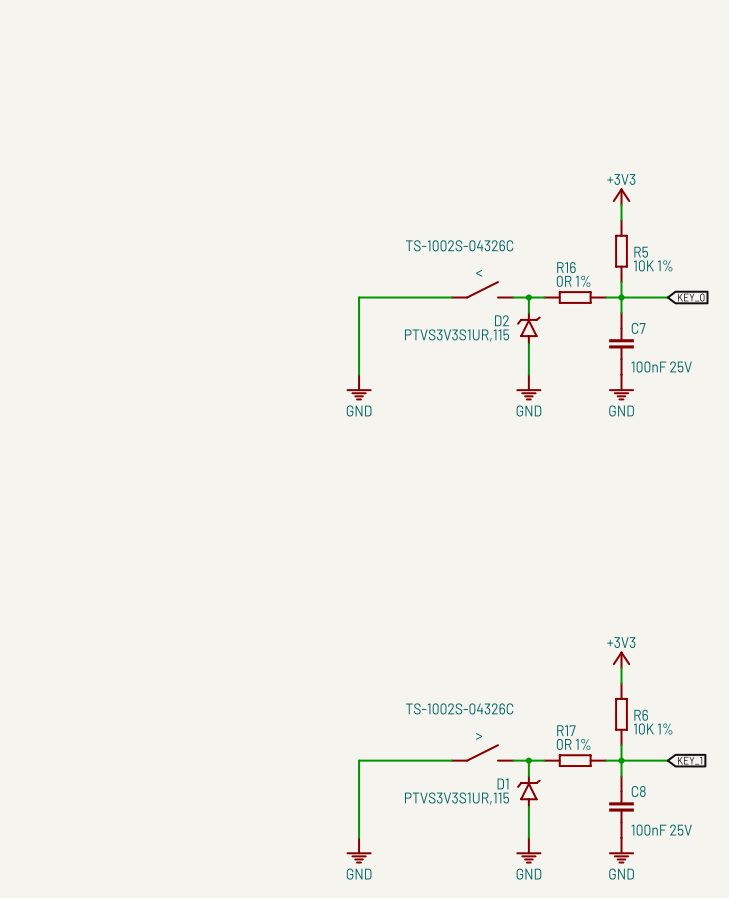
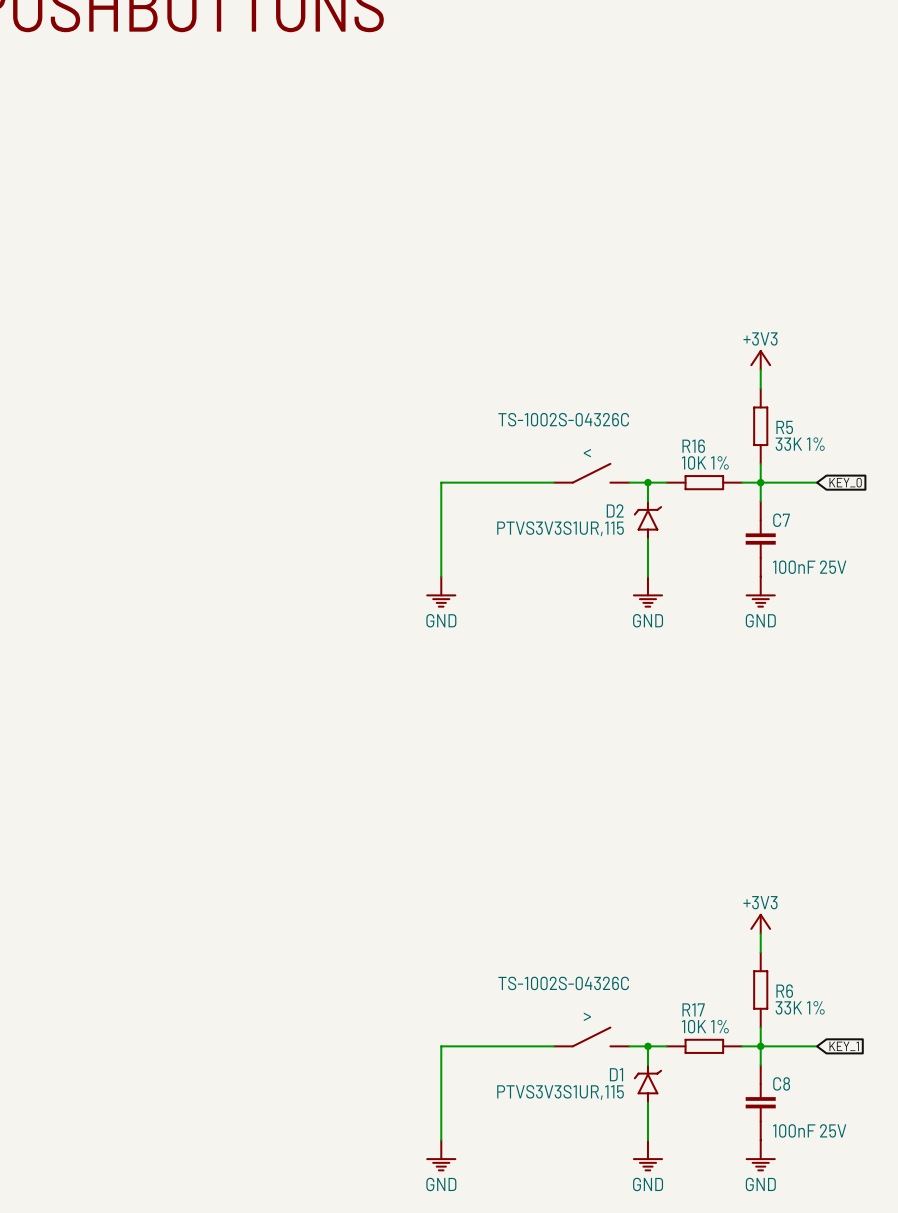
R5 value: 10K 1% (653, 265) -> 33K 1% (800, 444)
R16 value: 0R 1% (573, 281) -> 10K 1% (705, 462)
R6 value: 10K 1% (653, 729) -> 33K 1% (800, 1007)
R17 value: 0R 1% (573, 744) -> 10K 1% (705, 1026)

